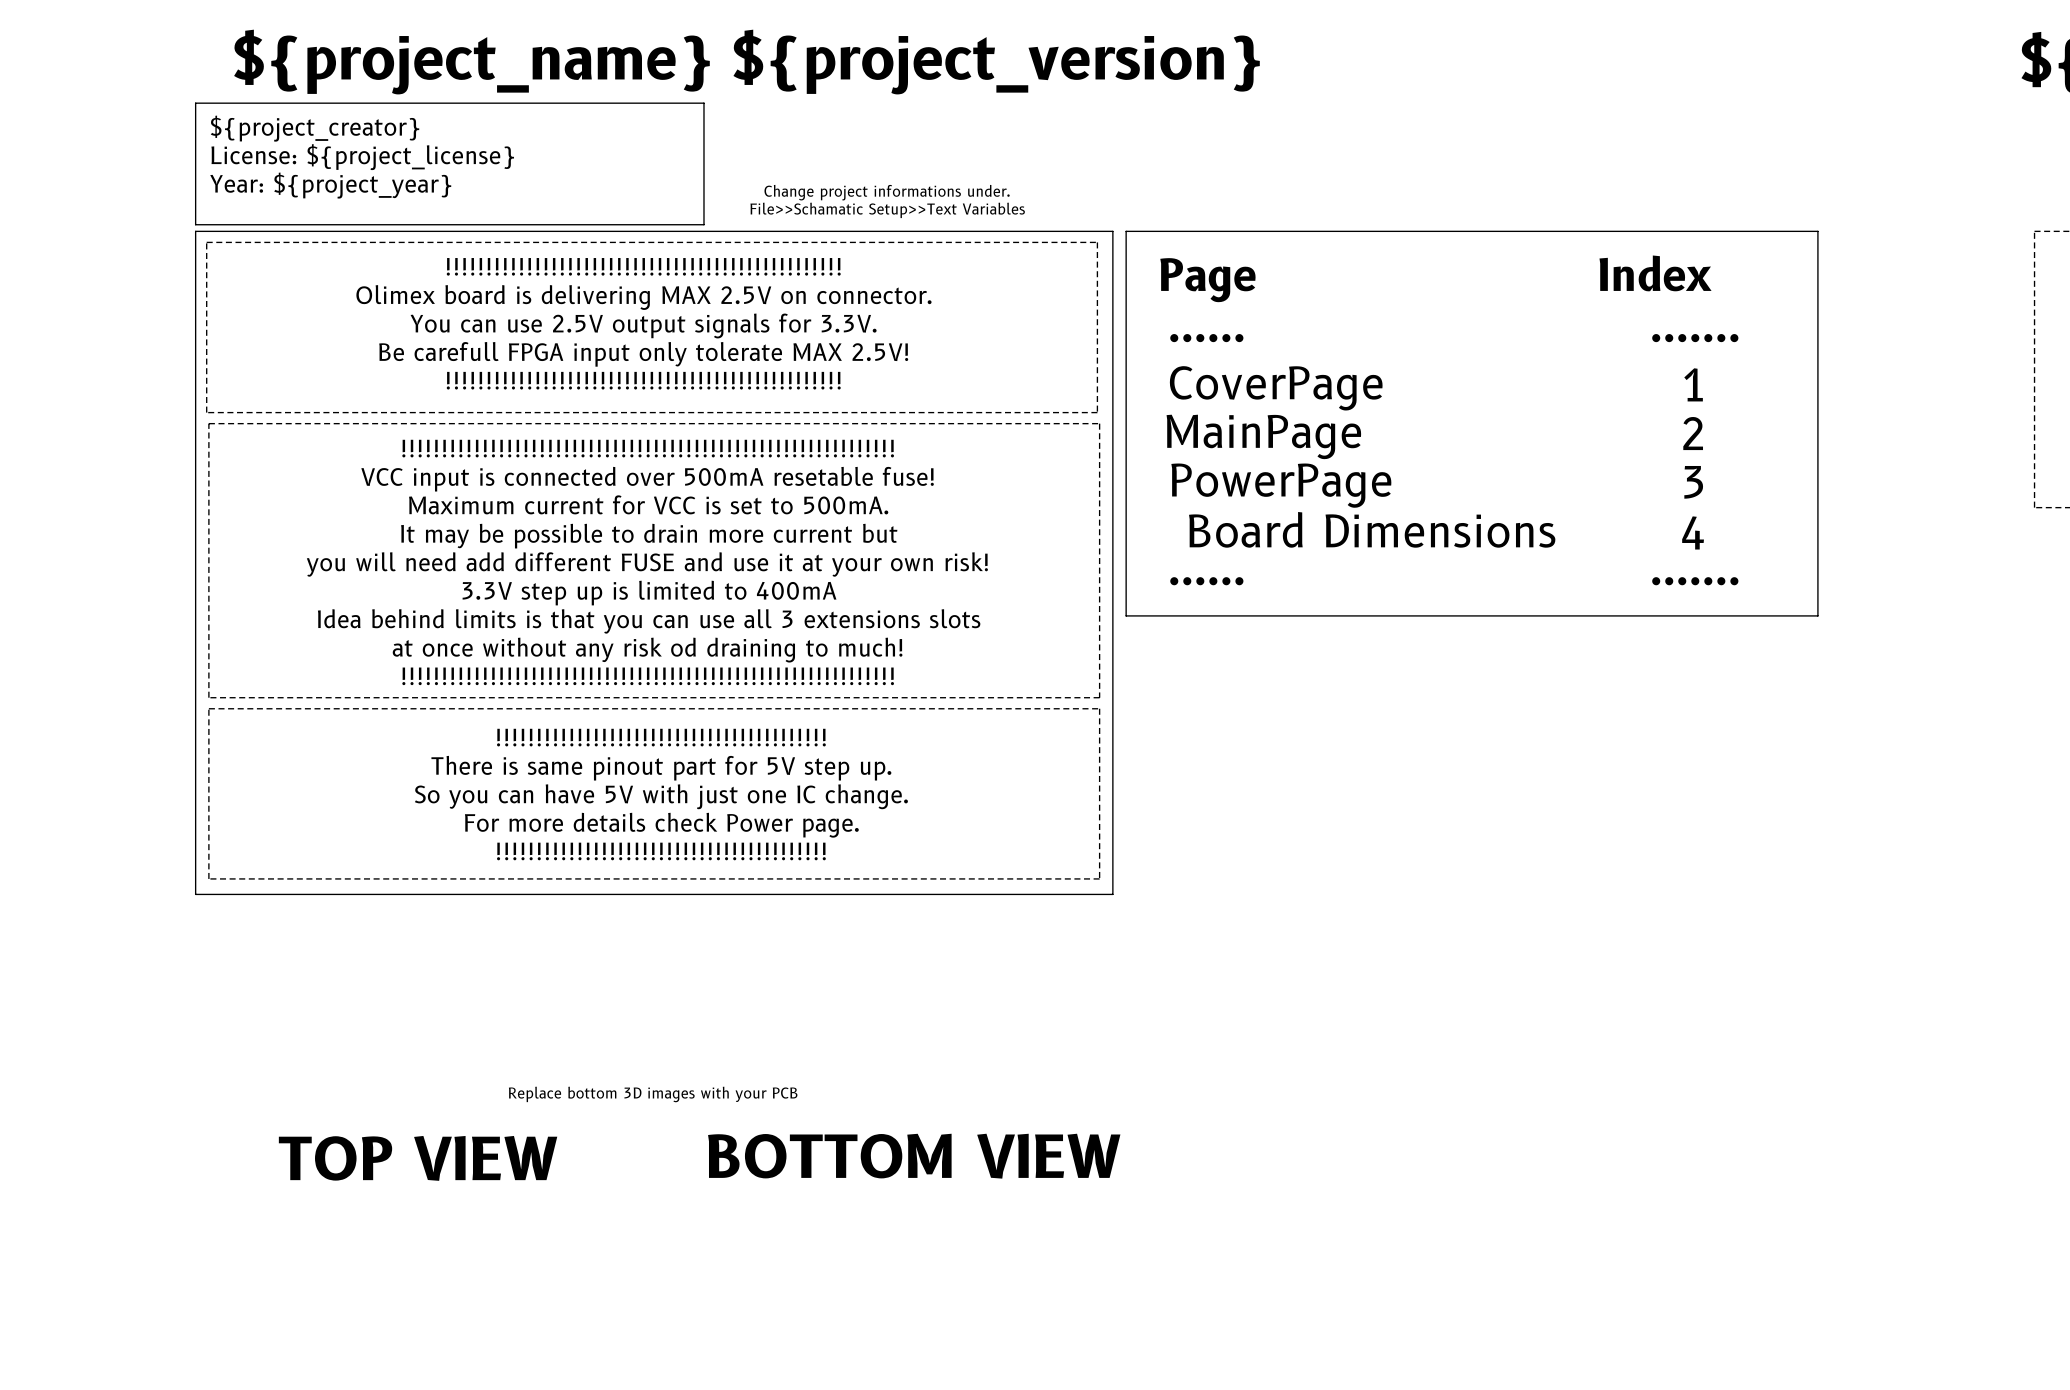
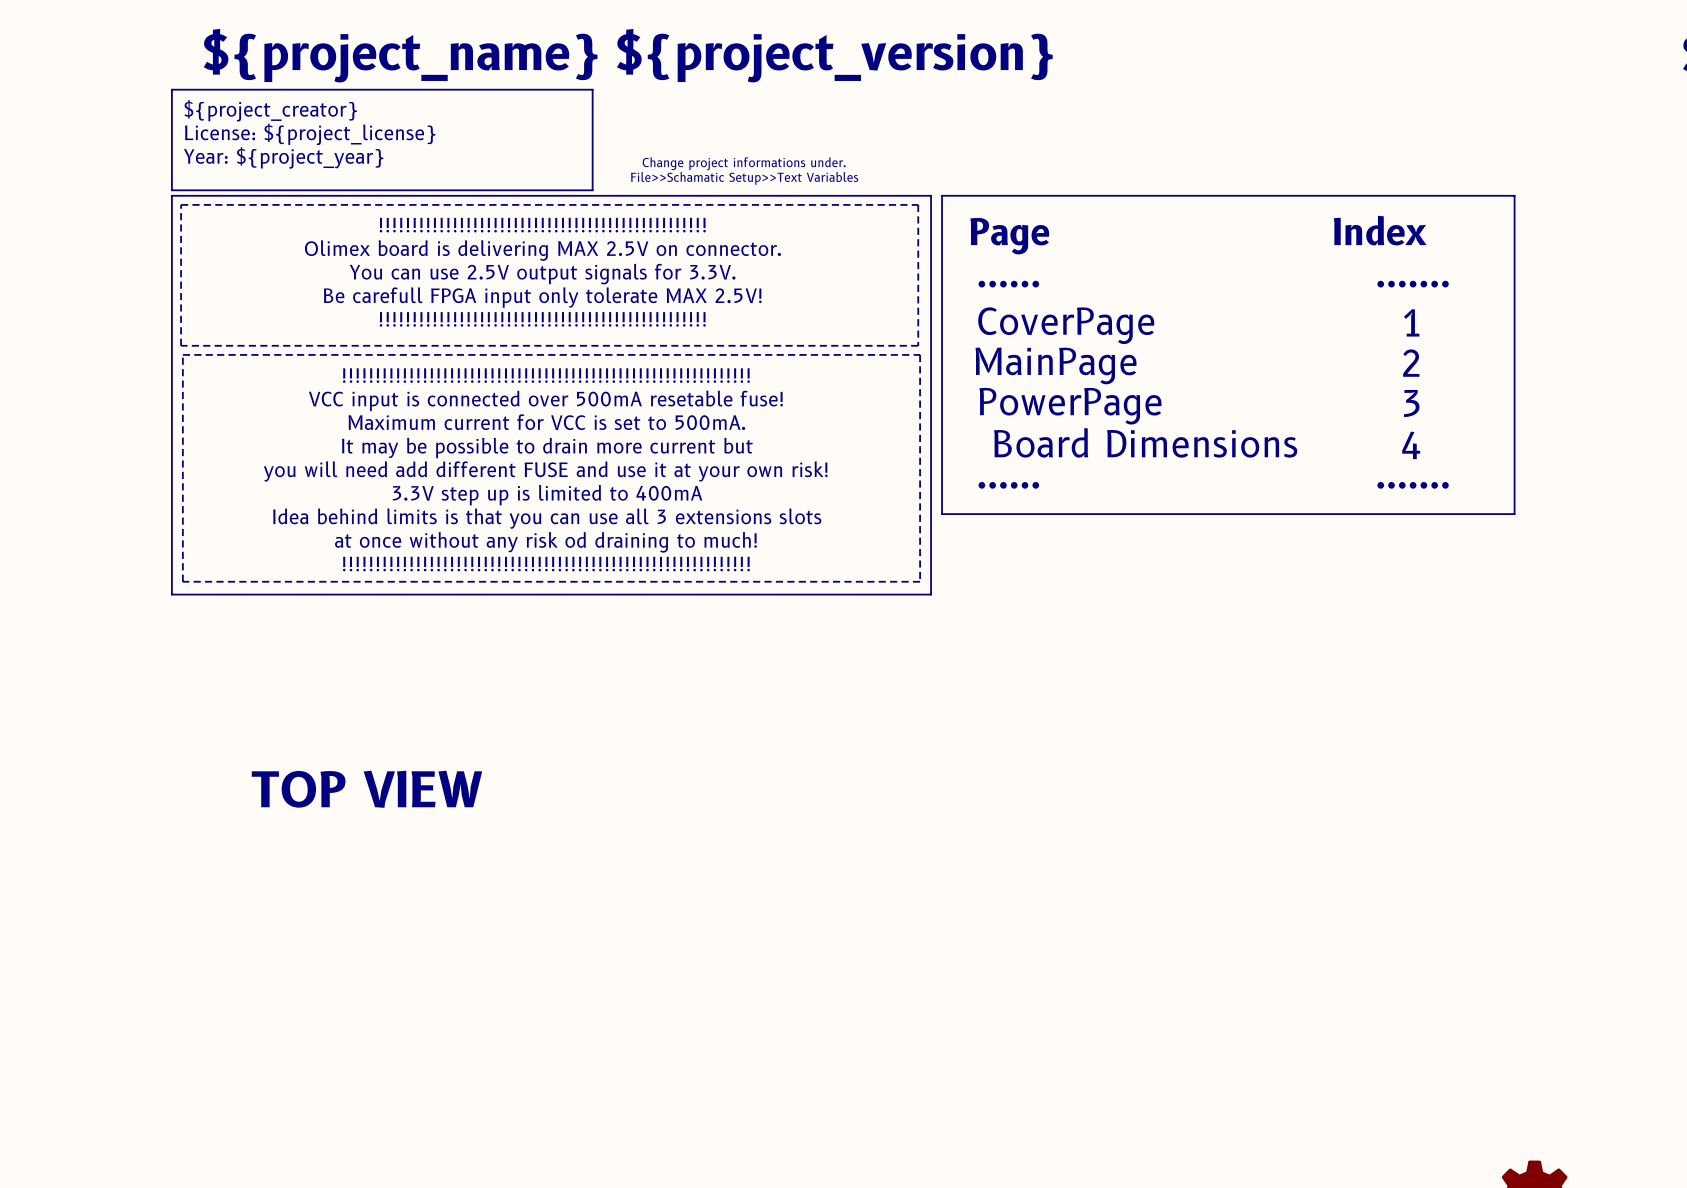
line: (208, 708) (208, 878) (1099, 878) (1099, 708) (208, 708) -> none
line: (195, 713) (195, 894) (1112, 894) (1112, 713) -> (171, 594) (931, 594)
text: !!!!!!!!!!!!!!!!!!!!!!!!!!!!!!!!!!!!!!!!! (661, 737) -> none
text: There is same pinout part for 5V step up. (661, 768) -> none
text: So you can have 5V with just one IC change. (661, 796) -> none
text: For more details check Power page. (661, 825) -> none
text: !!!!!!!!!!!!!!!!!!!!!!!!!!!!!!!!!!!!!!!!! (661, 851) -> none
text: Replace bottom 3D images with your PCB (653, 1094) -> none
text: BOTTOM VIEW (914, 1156) -> none
text position: TOP VIEW (418, 1158) -> TOP VIEW (366, 789)

